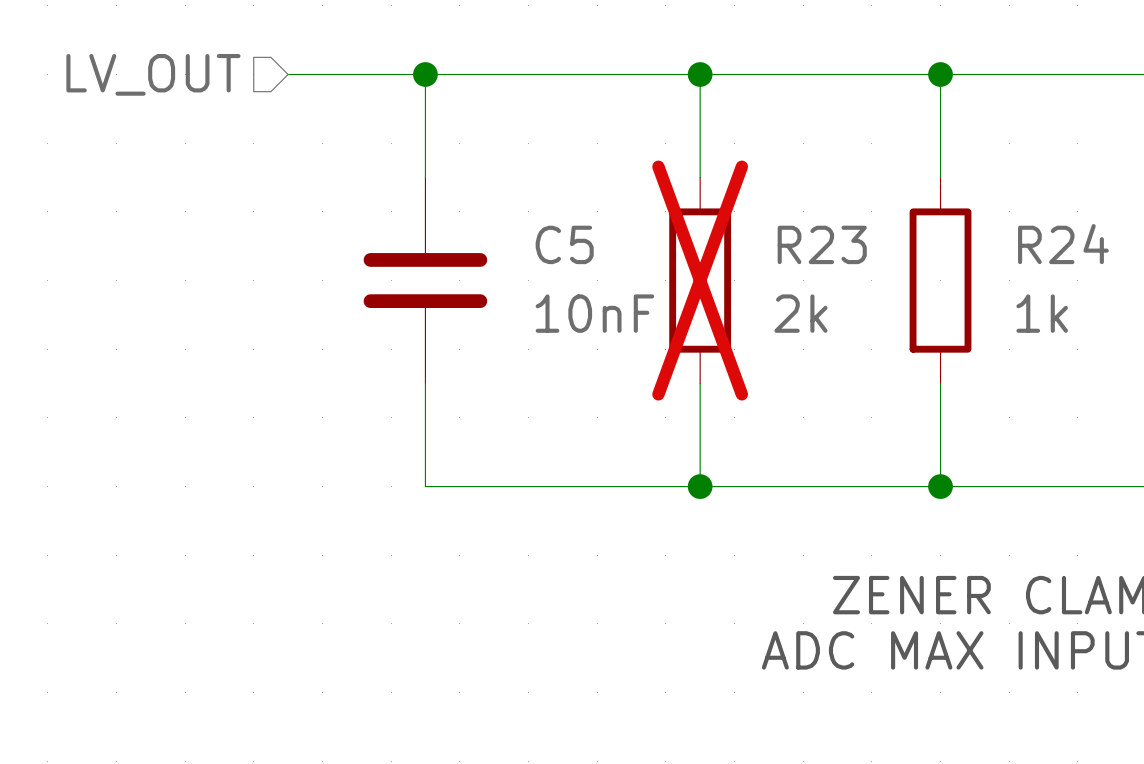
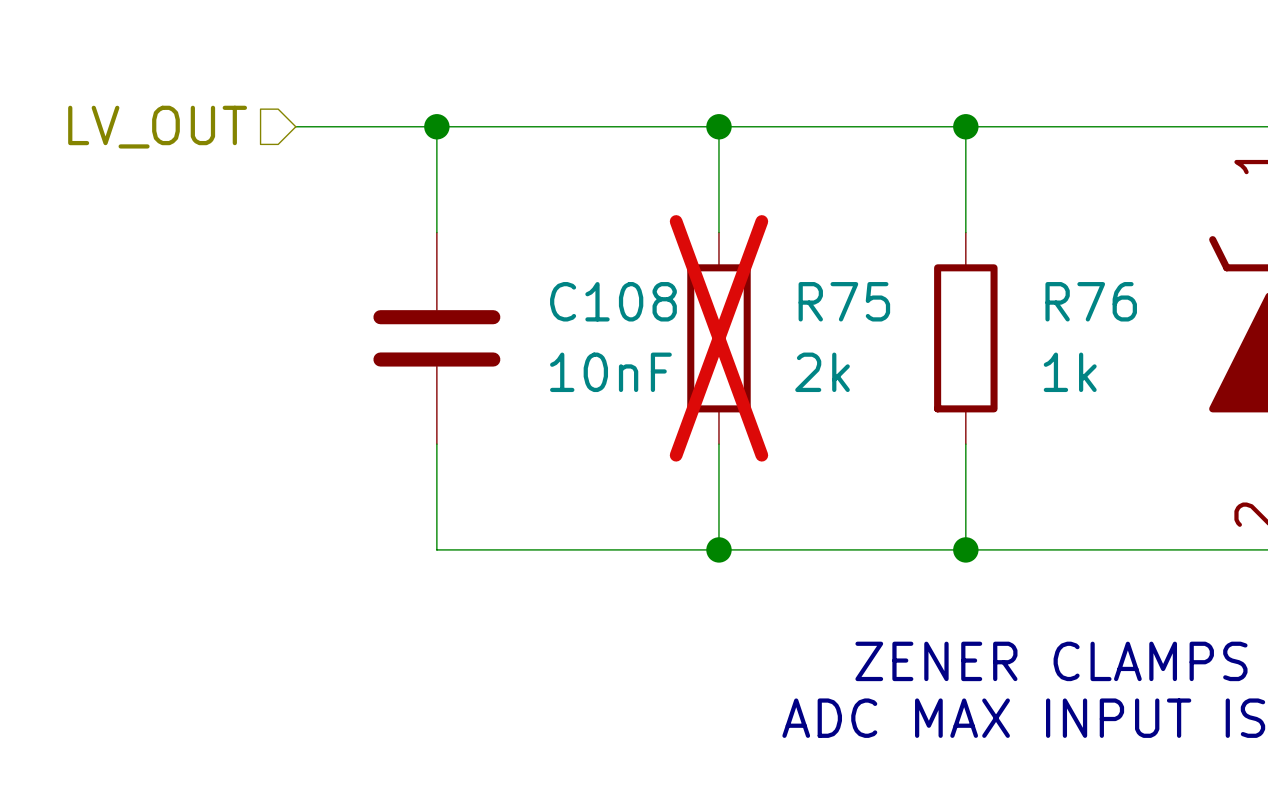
C5 name: C5 (564, 244) -> C108 (613, 301)
R23 name: R23 (822, 244) -> R75 (844, 301)
R24 name: R24 (1063, 244) -> R76 (1091, 301)

